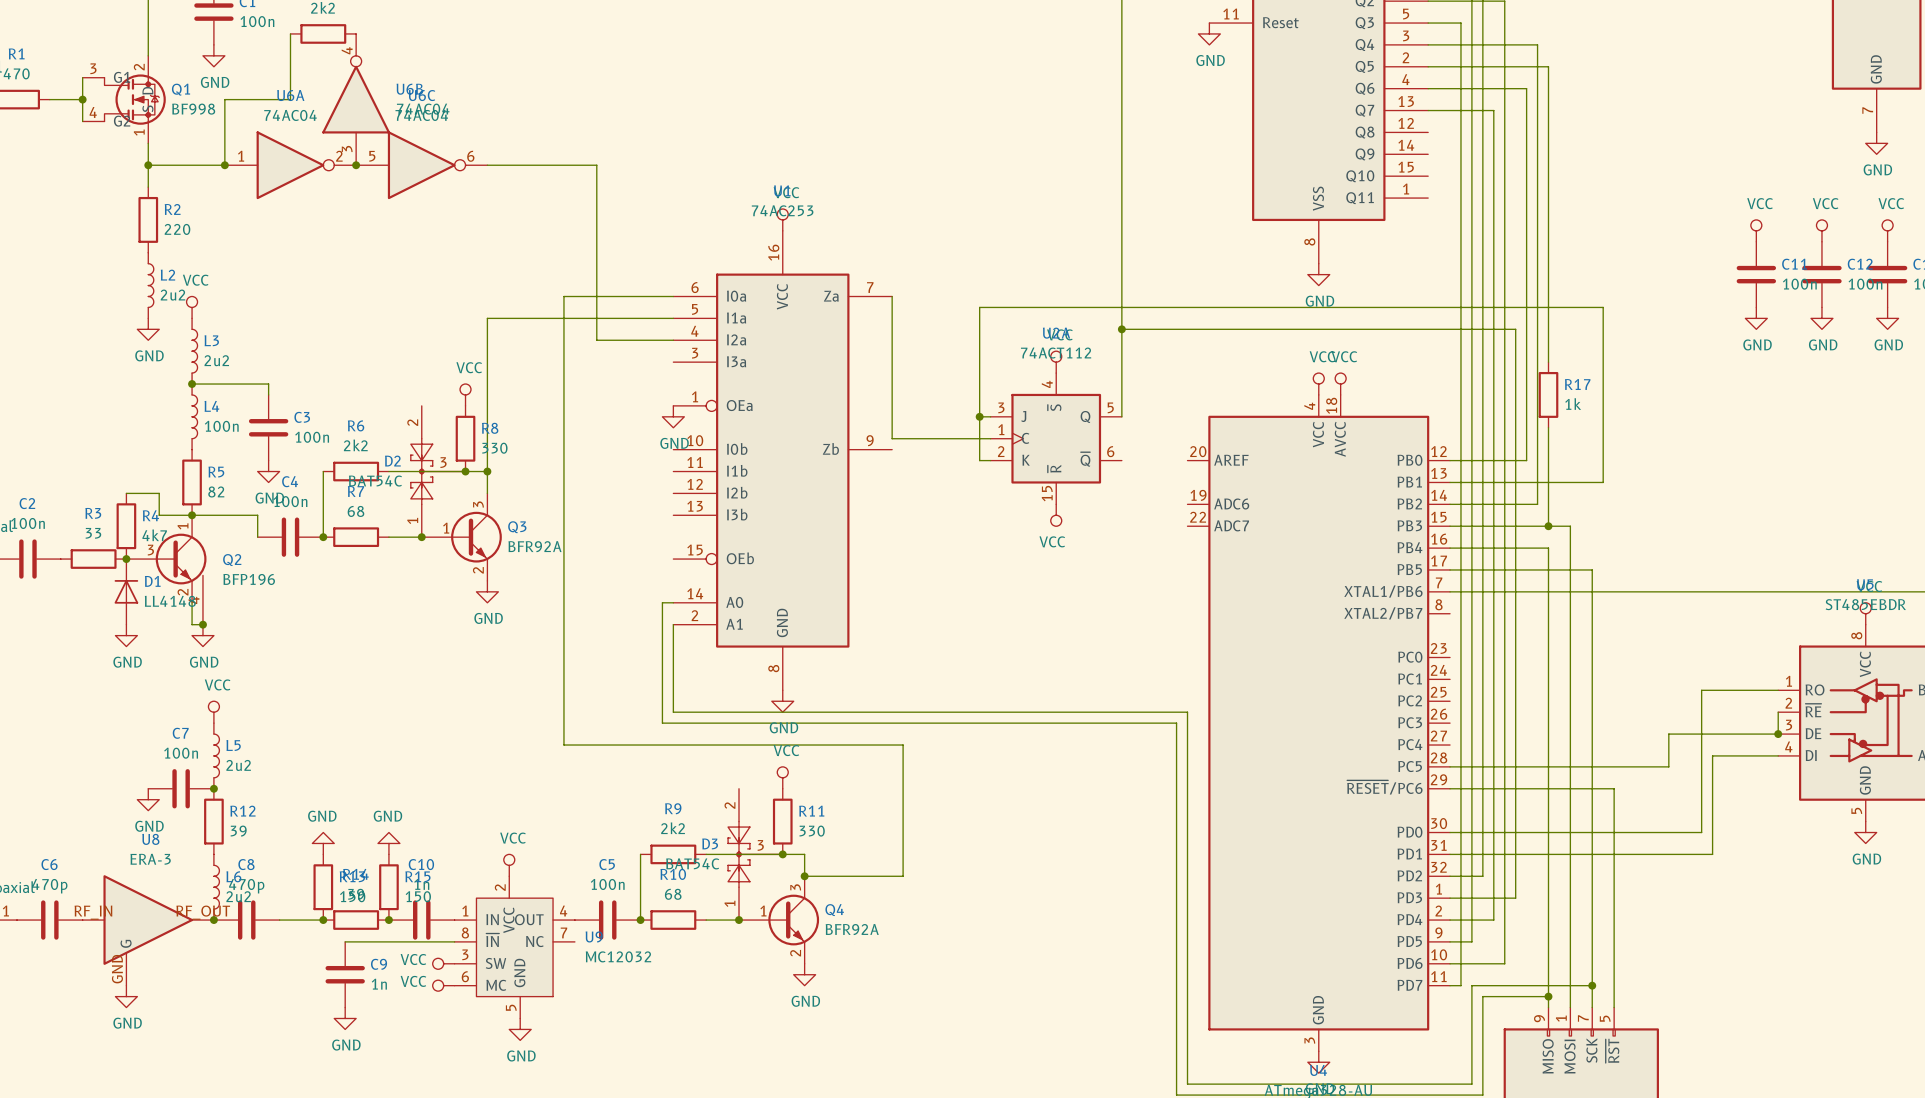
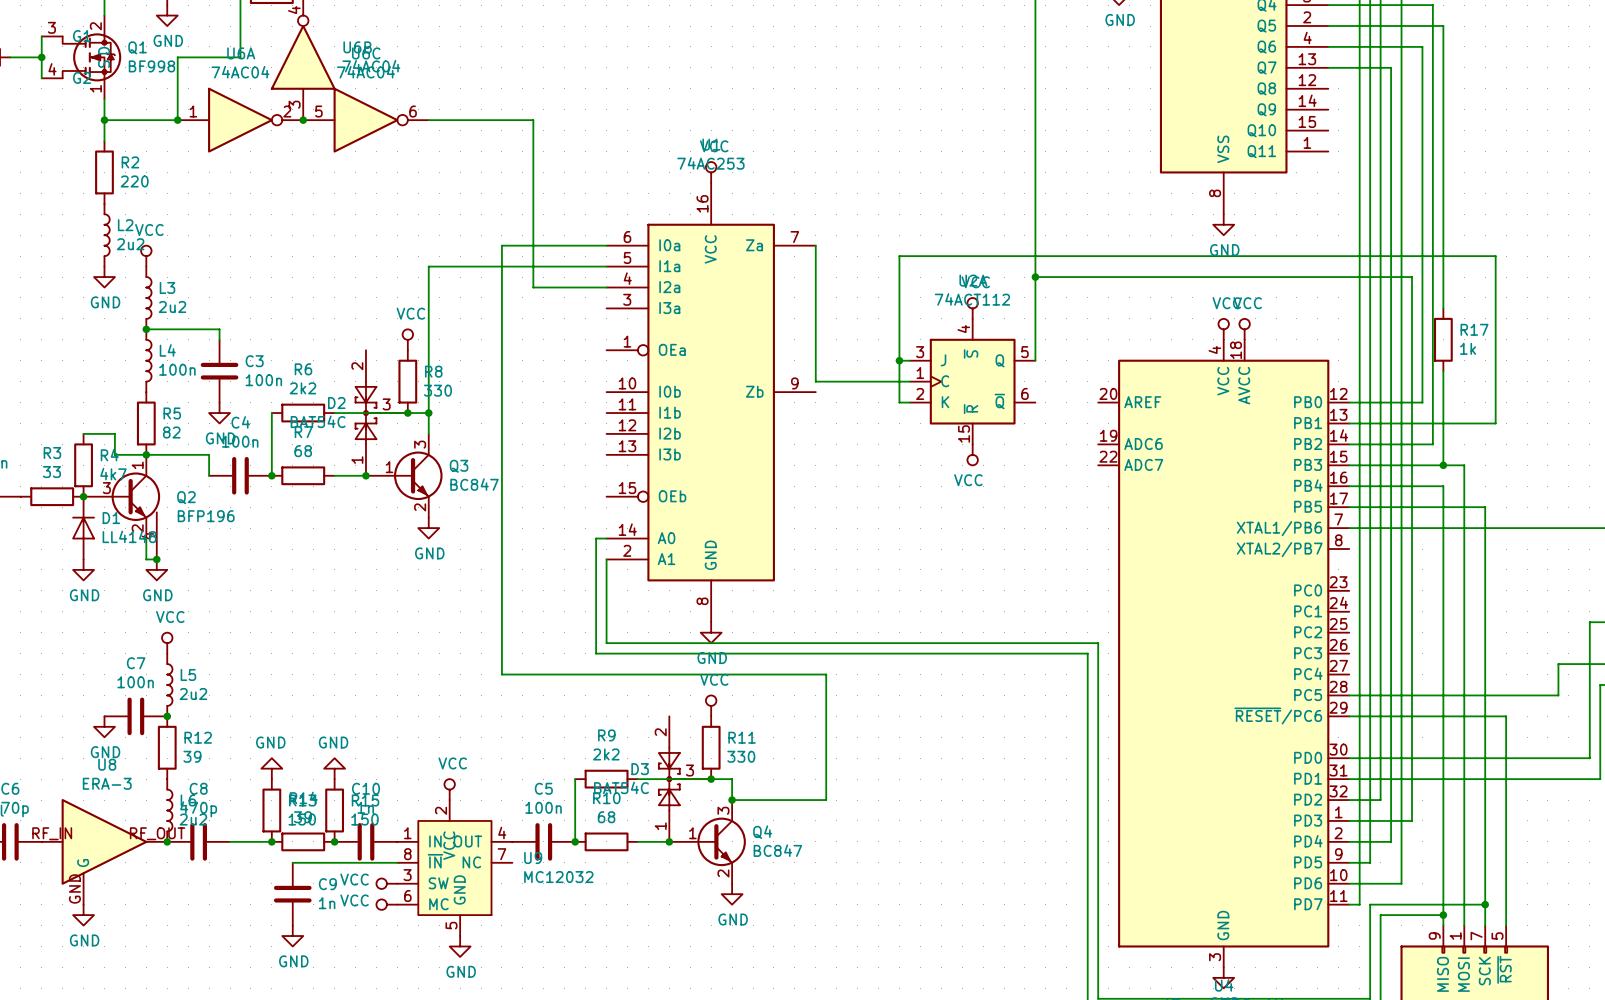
power symbol: GND (673, 416) -> none
Q3 value: BFR92A (535, 546) -> BC847 (474, 484)
Q4 value: BFR92A (852, 929) -> BC847 (777, 850)

